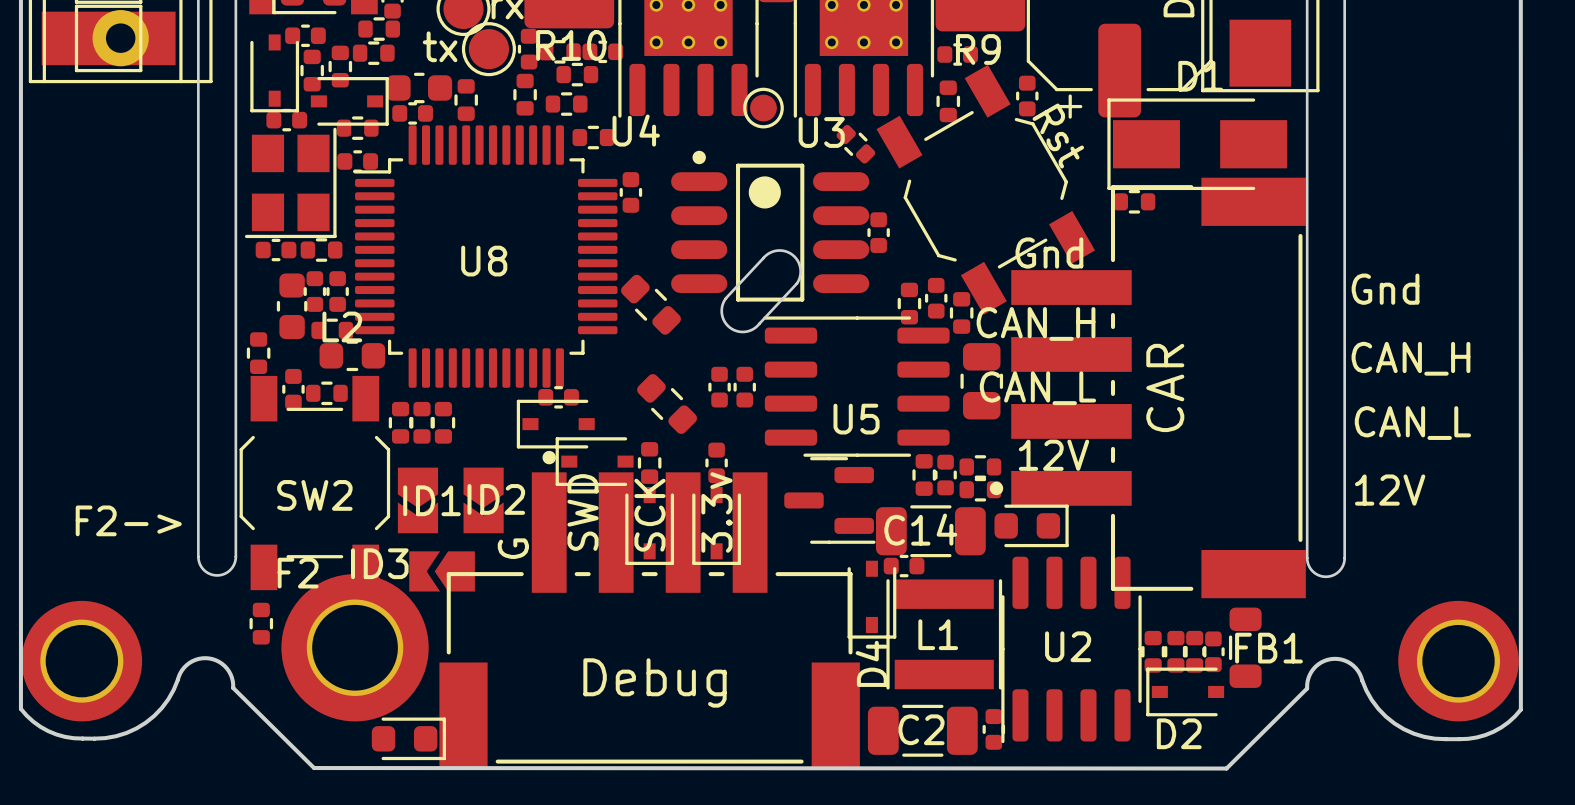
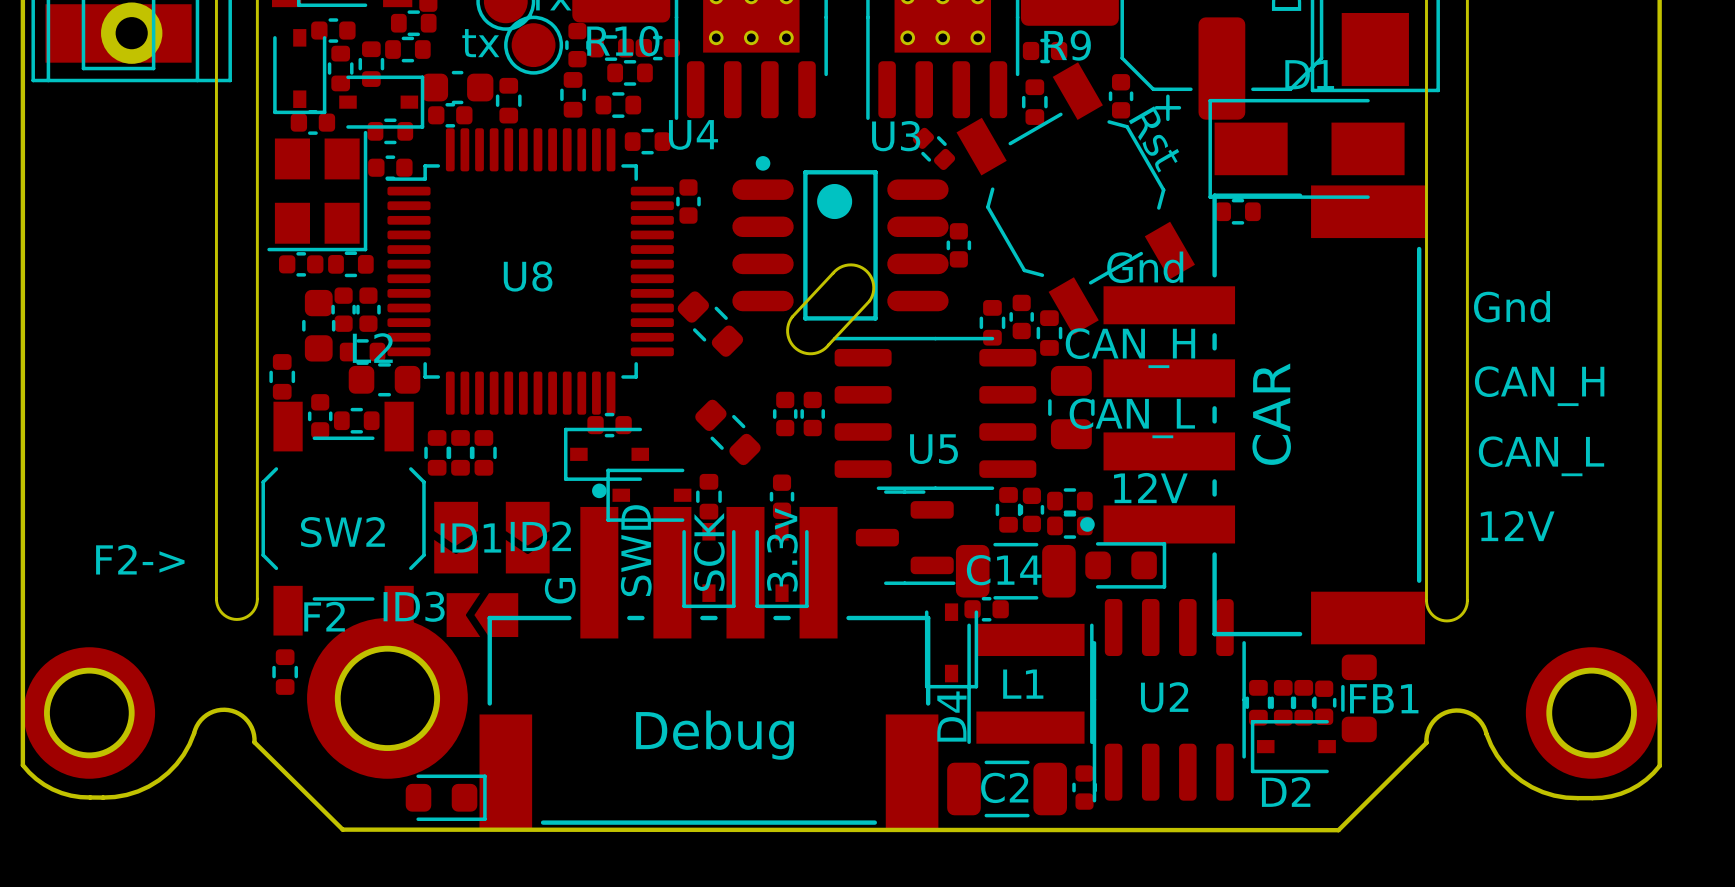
part: (763, 108) -> none

